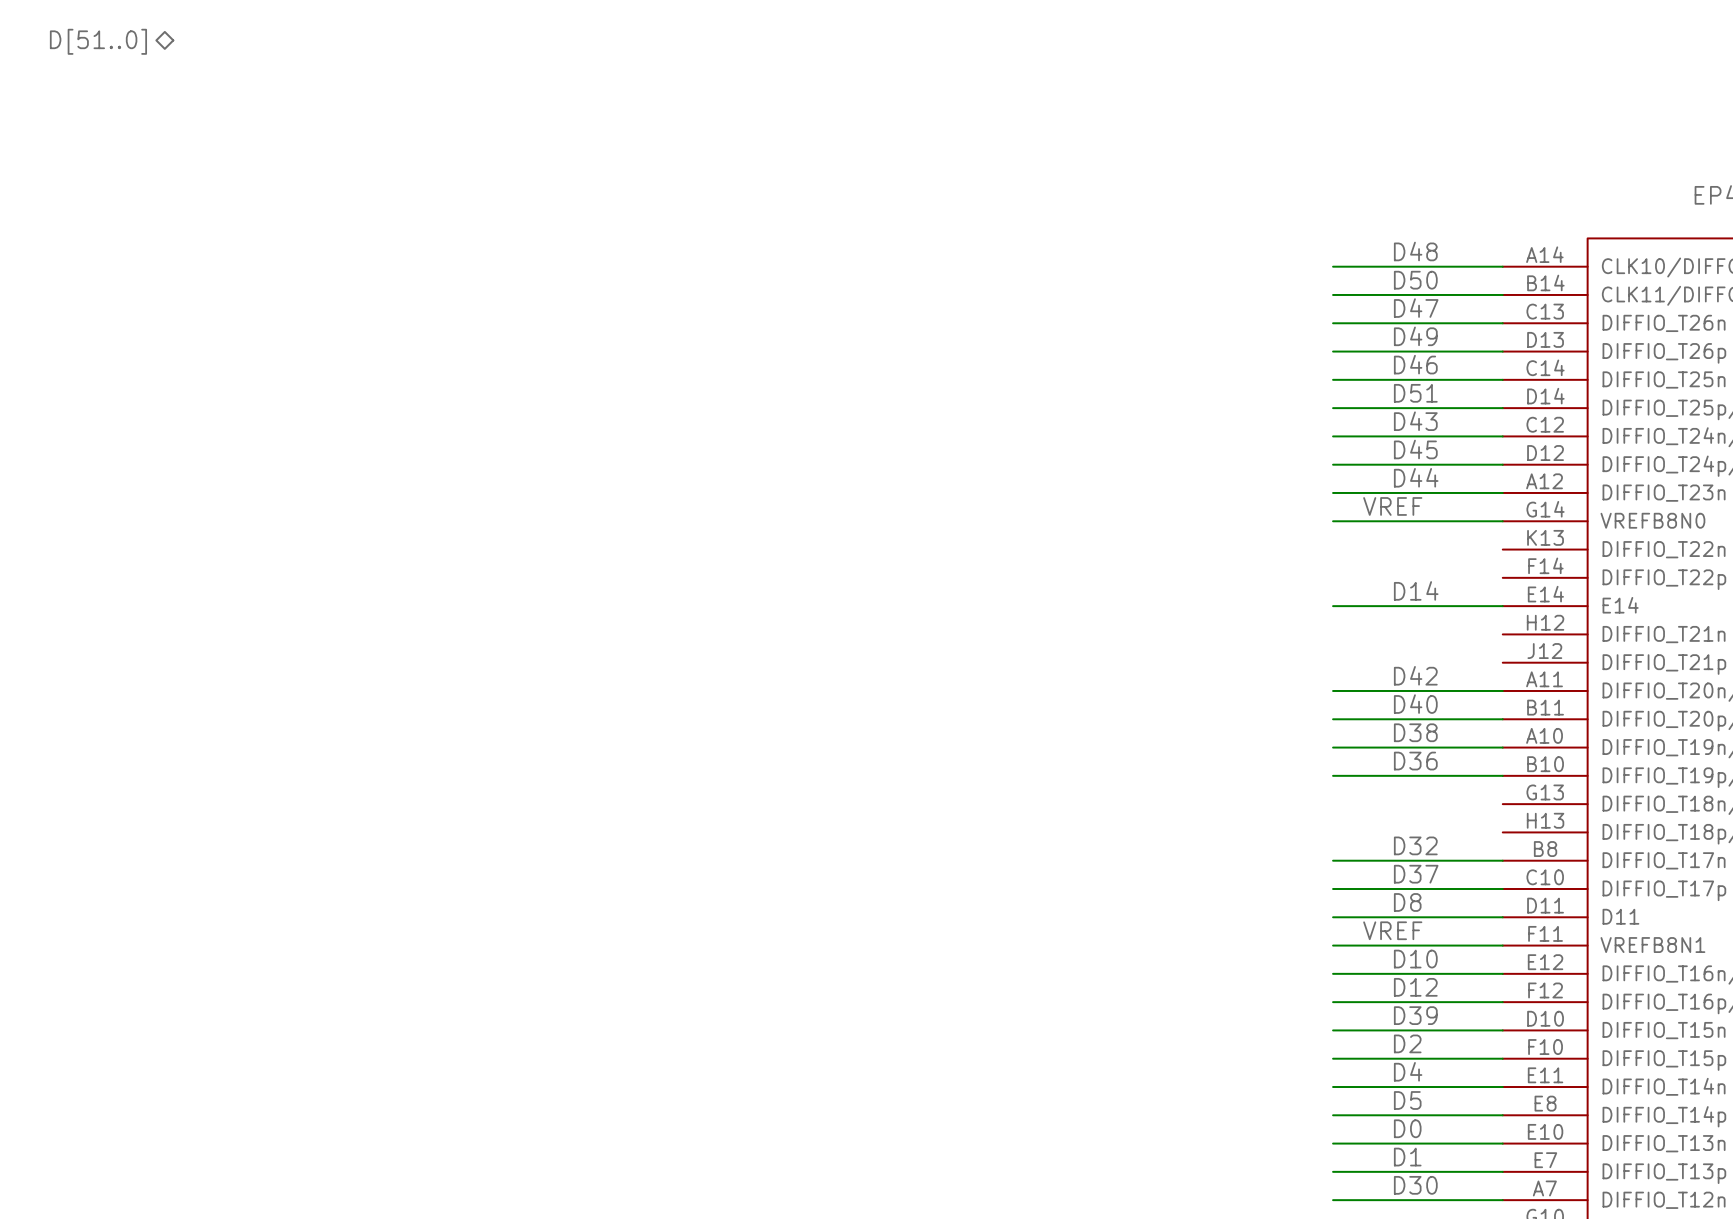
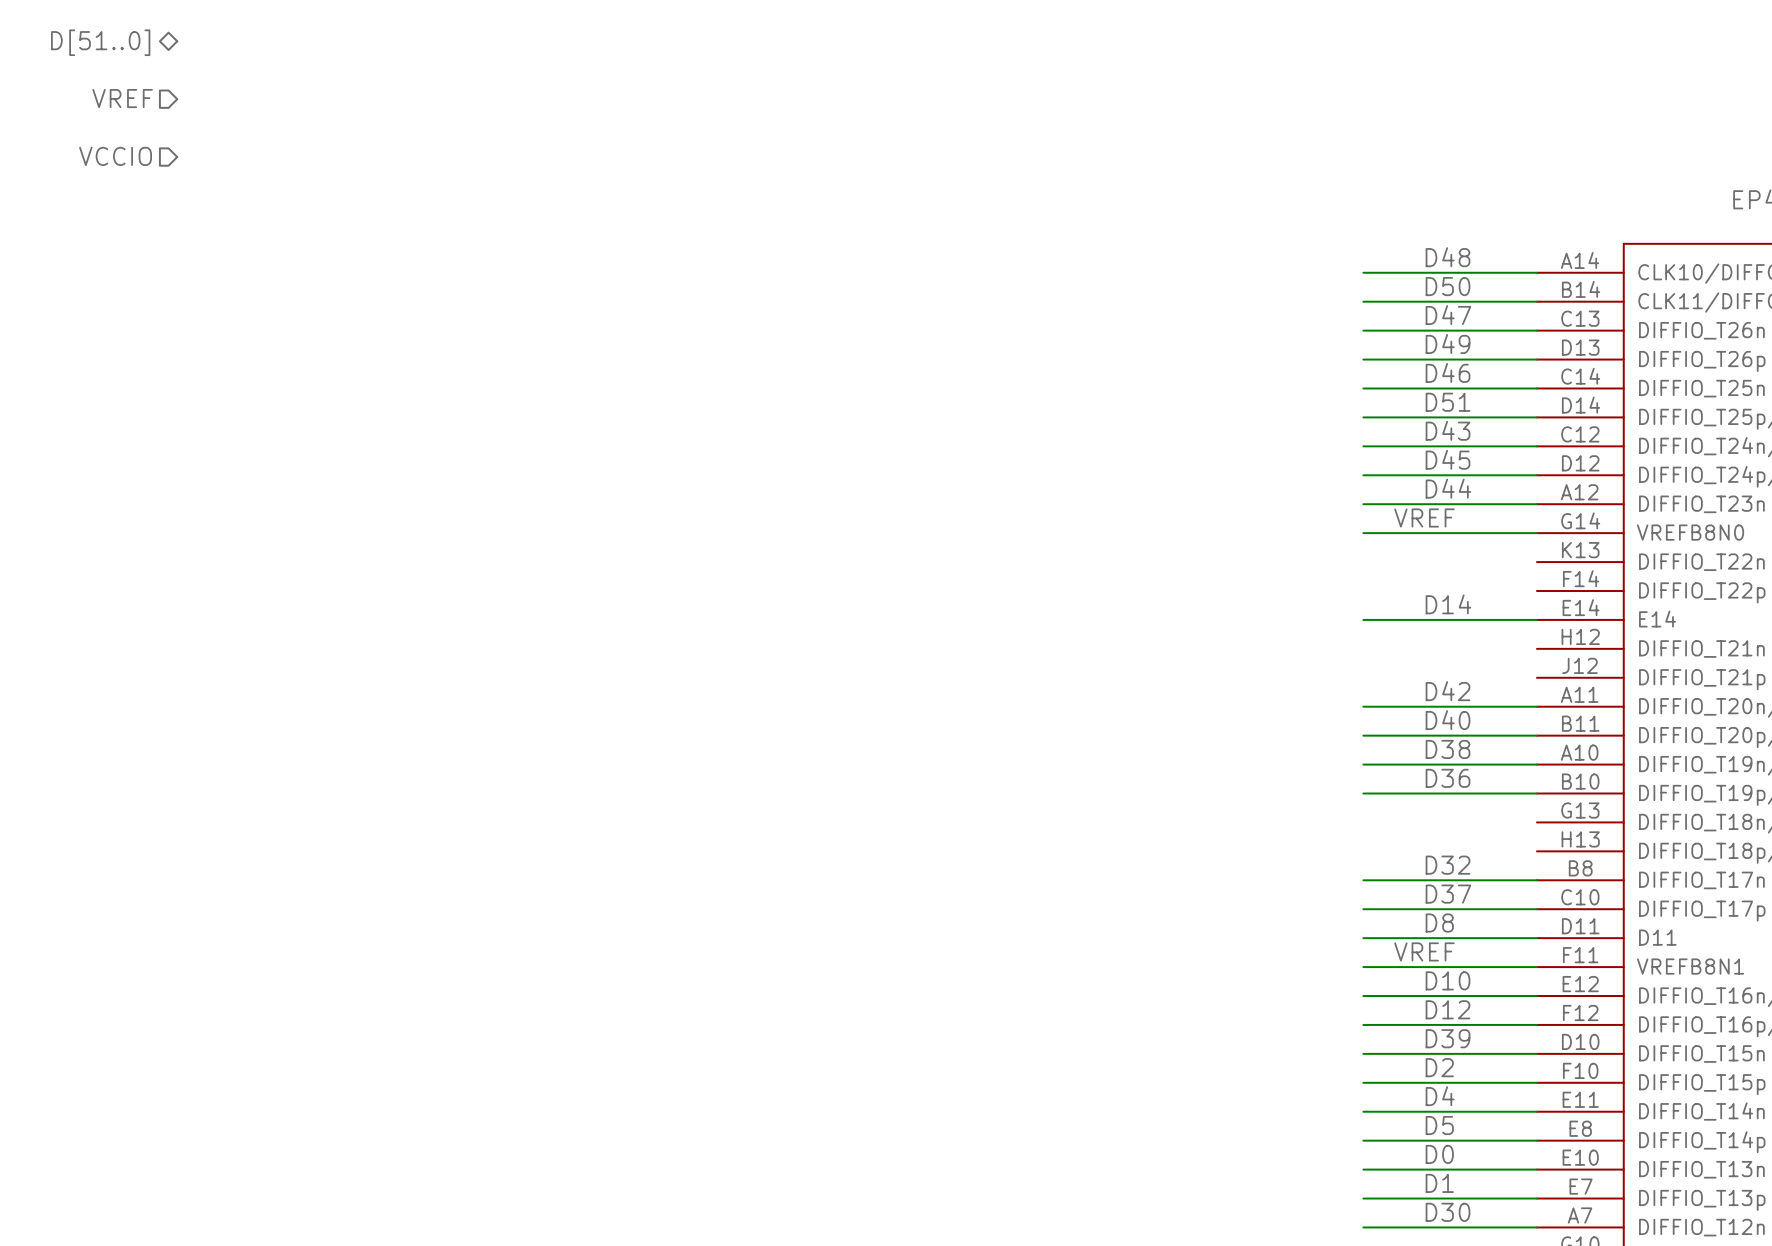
hierarchical label: none -> VREF (122, 98)
hierarchical label: none -> VCCIO (115, 156)

